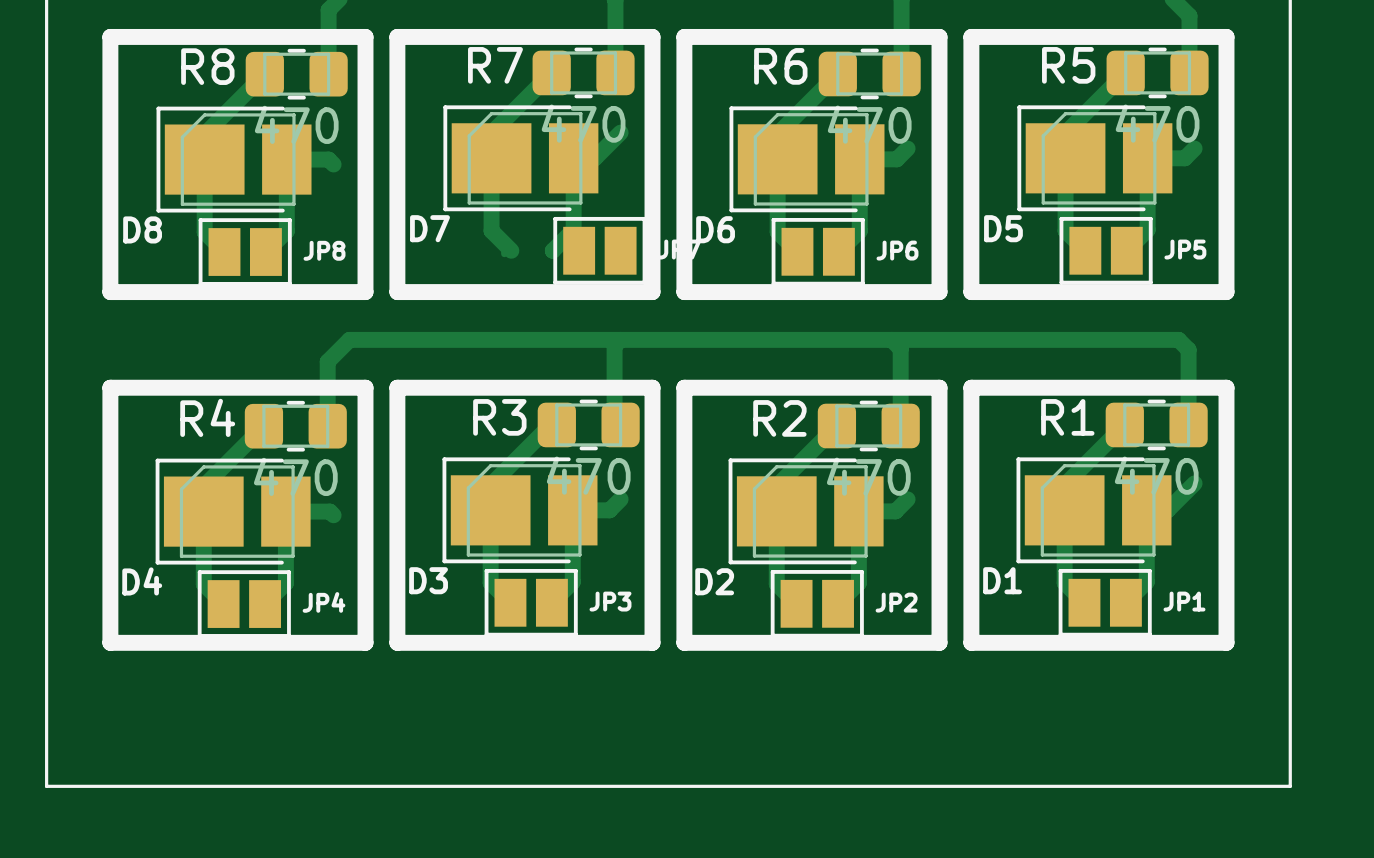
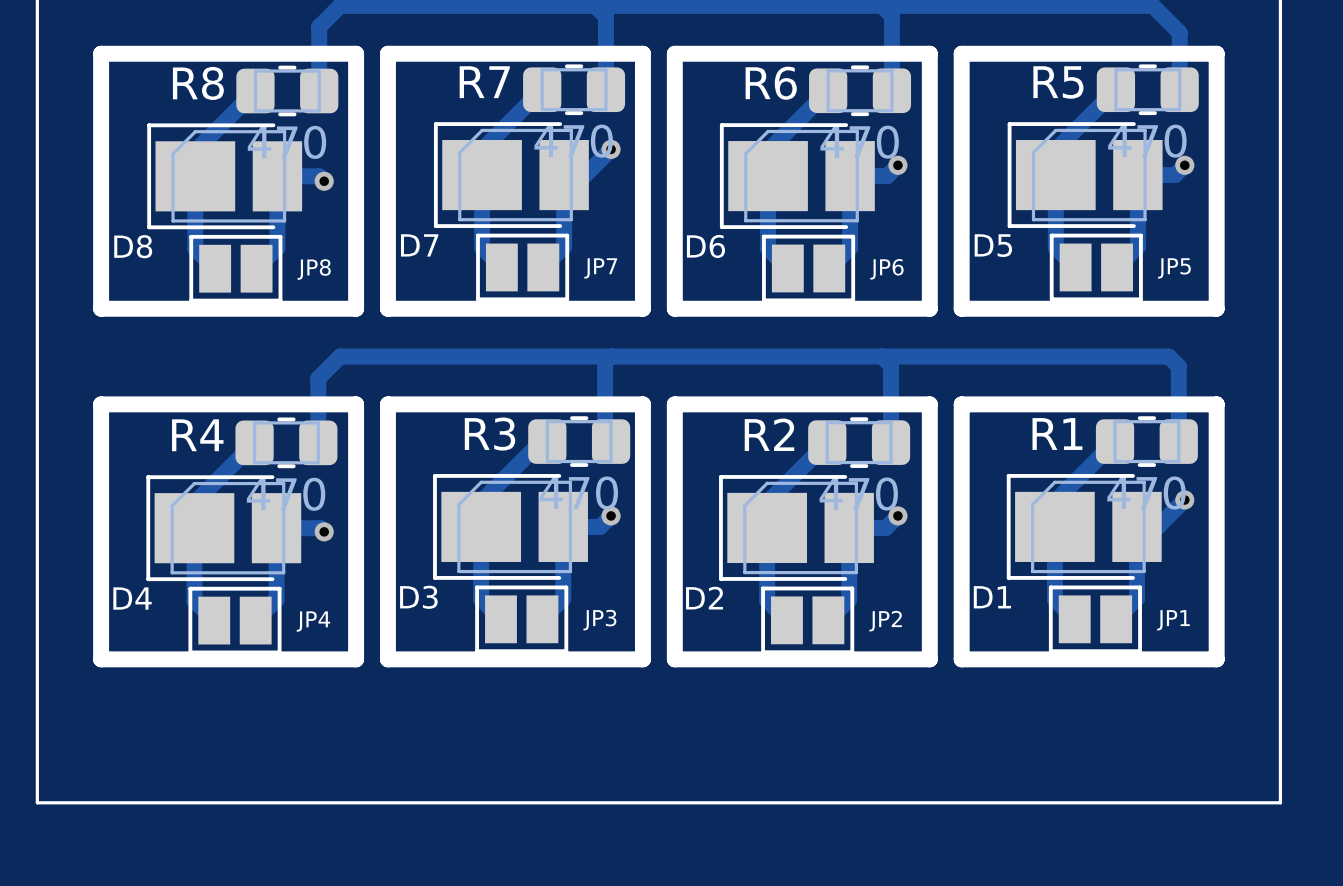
via: none -> (611, 149)
via: none -> (897, 165)
via: none -> (1184, 165)
via: none -> (324, 181)
JP7 position: (599, 250) -> (522, 267)
via: none -> (1184, 499)
via: none -> (611, 515)
via: none -> (897, 515)
via: none -> (324, 531)

